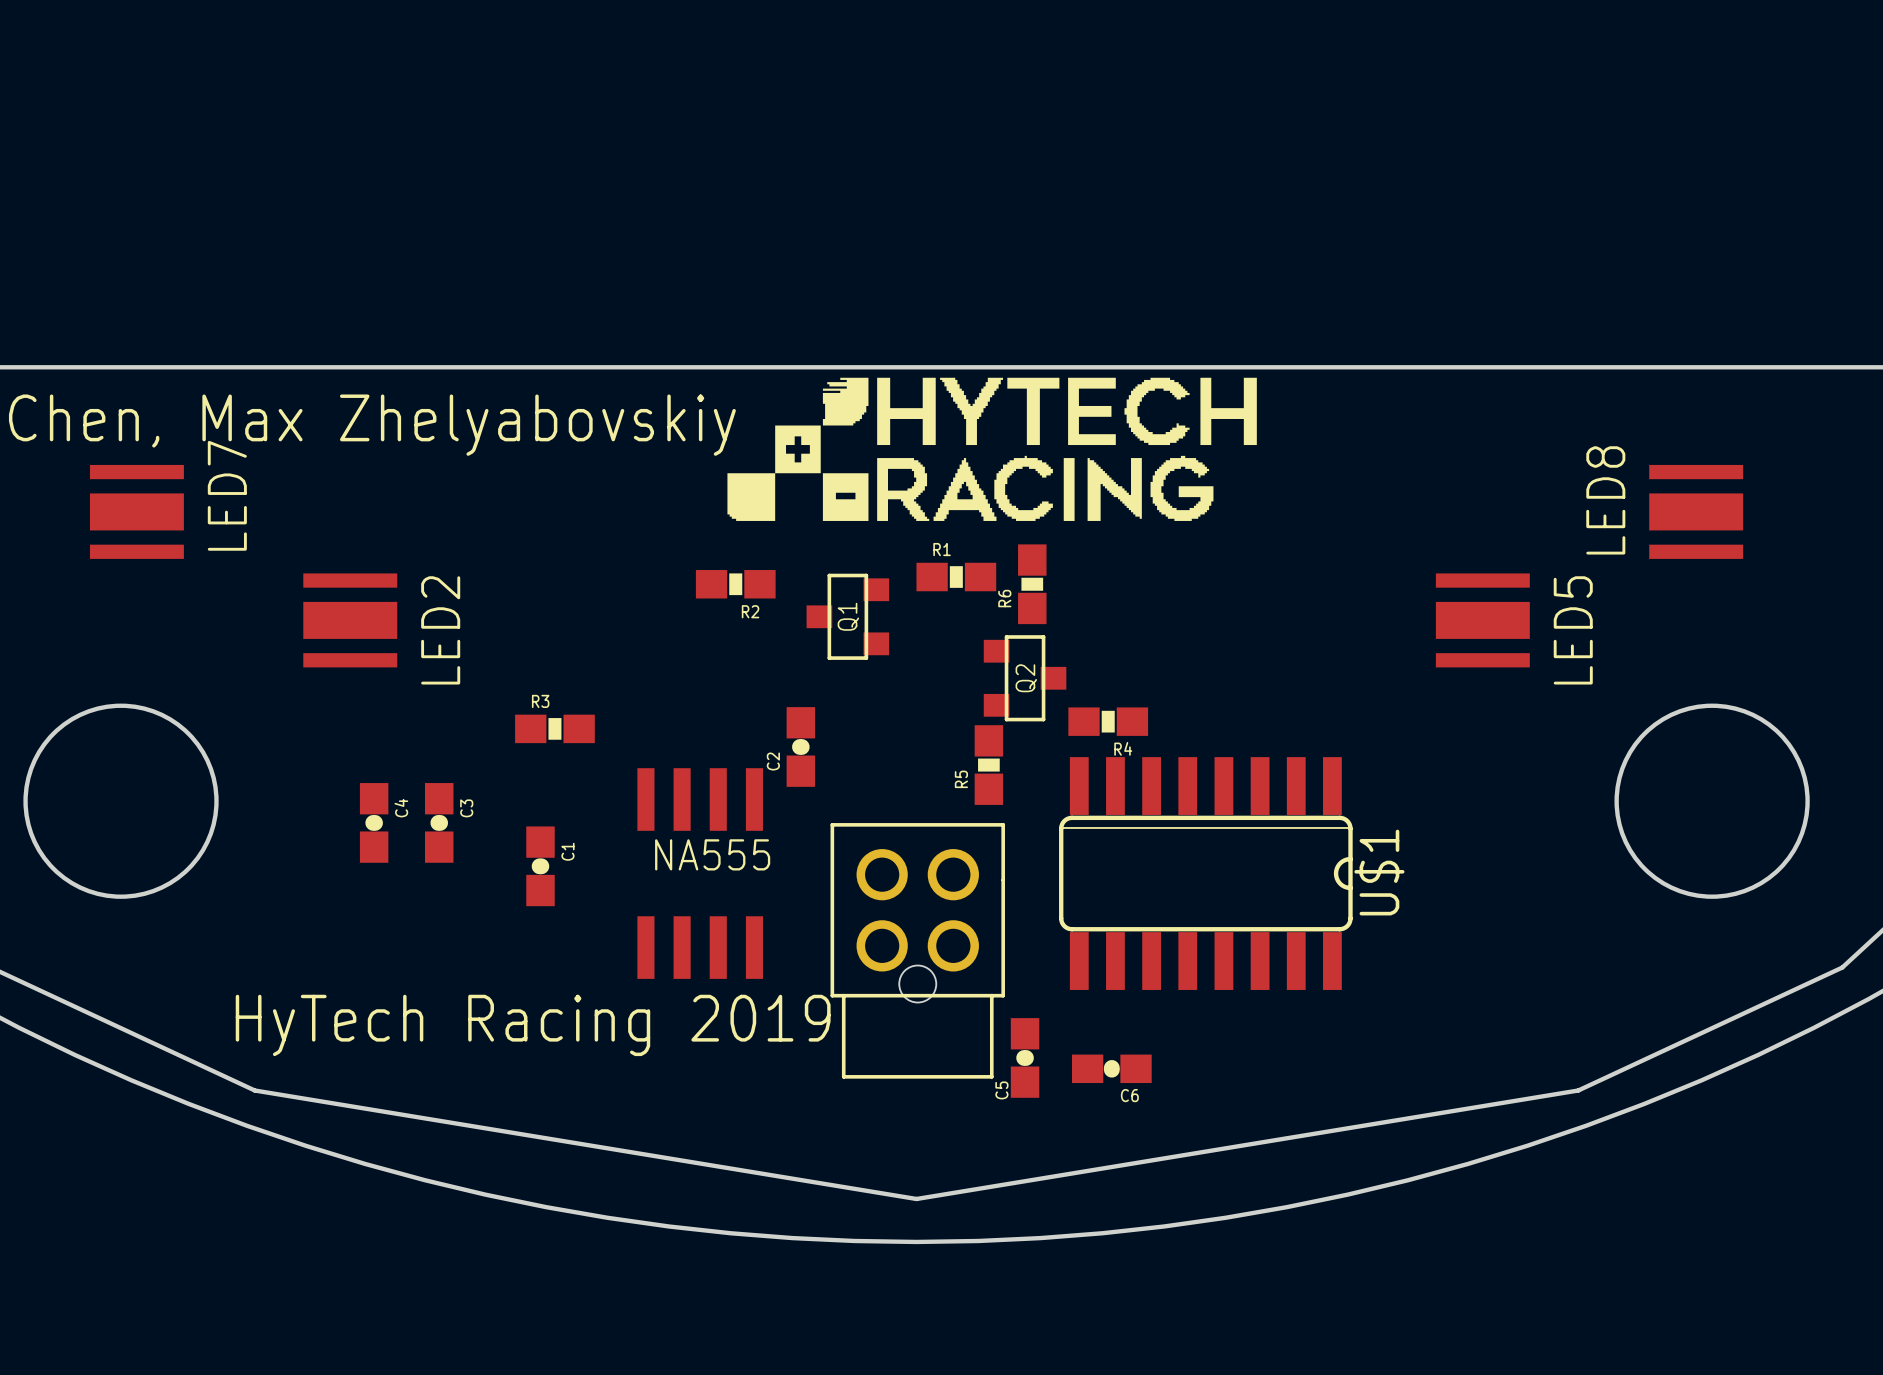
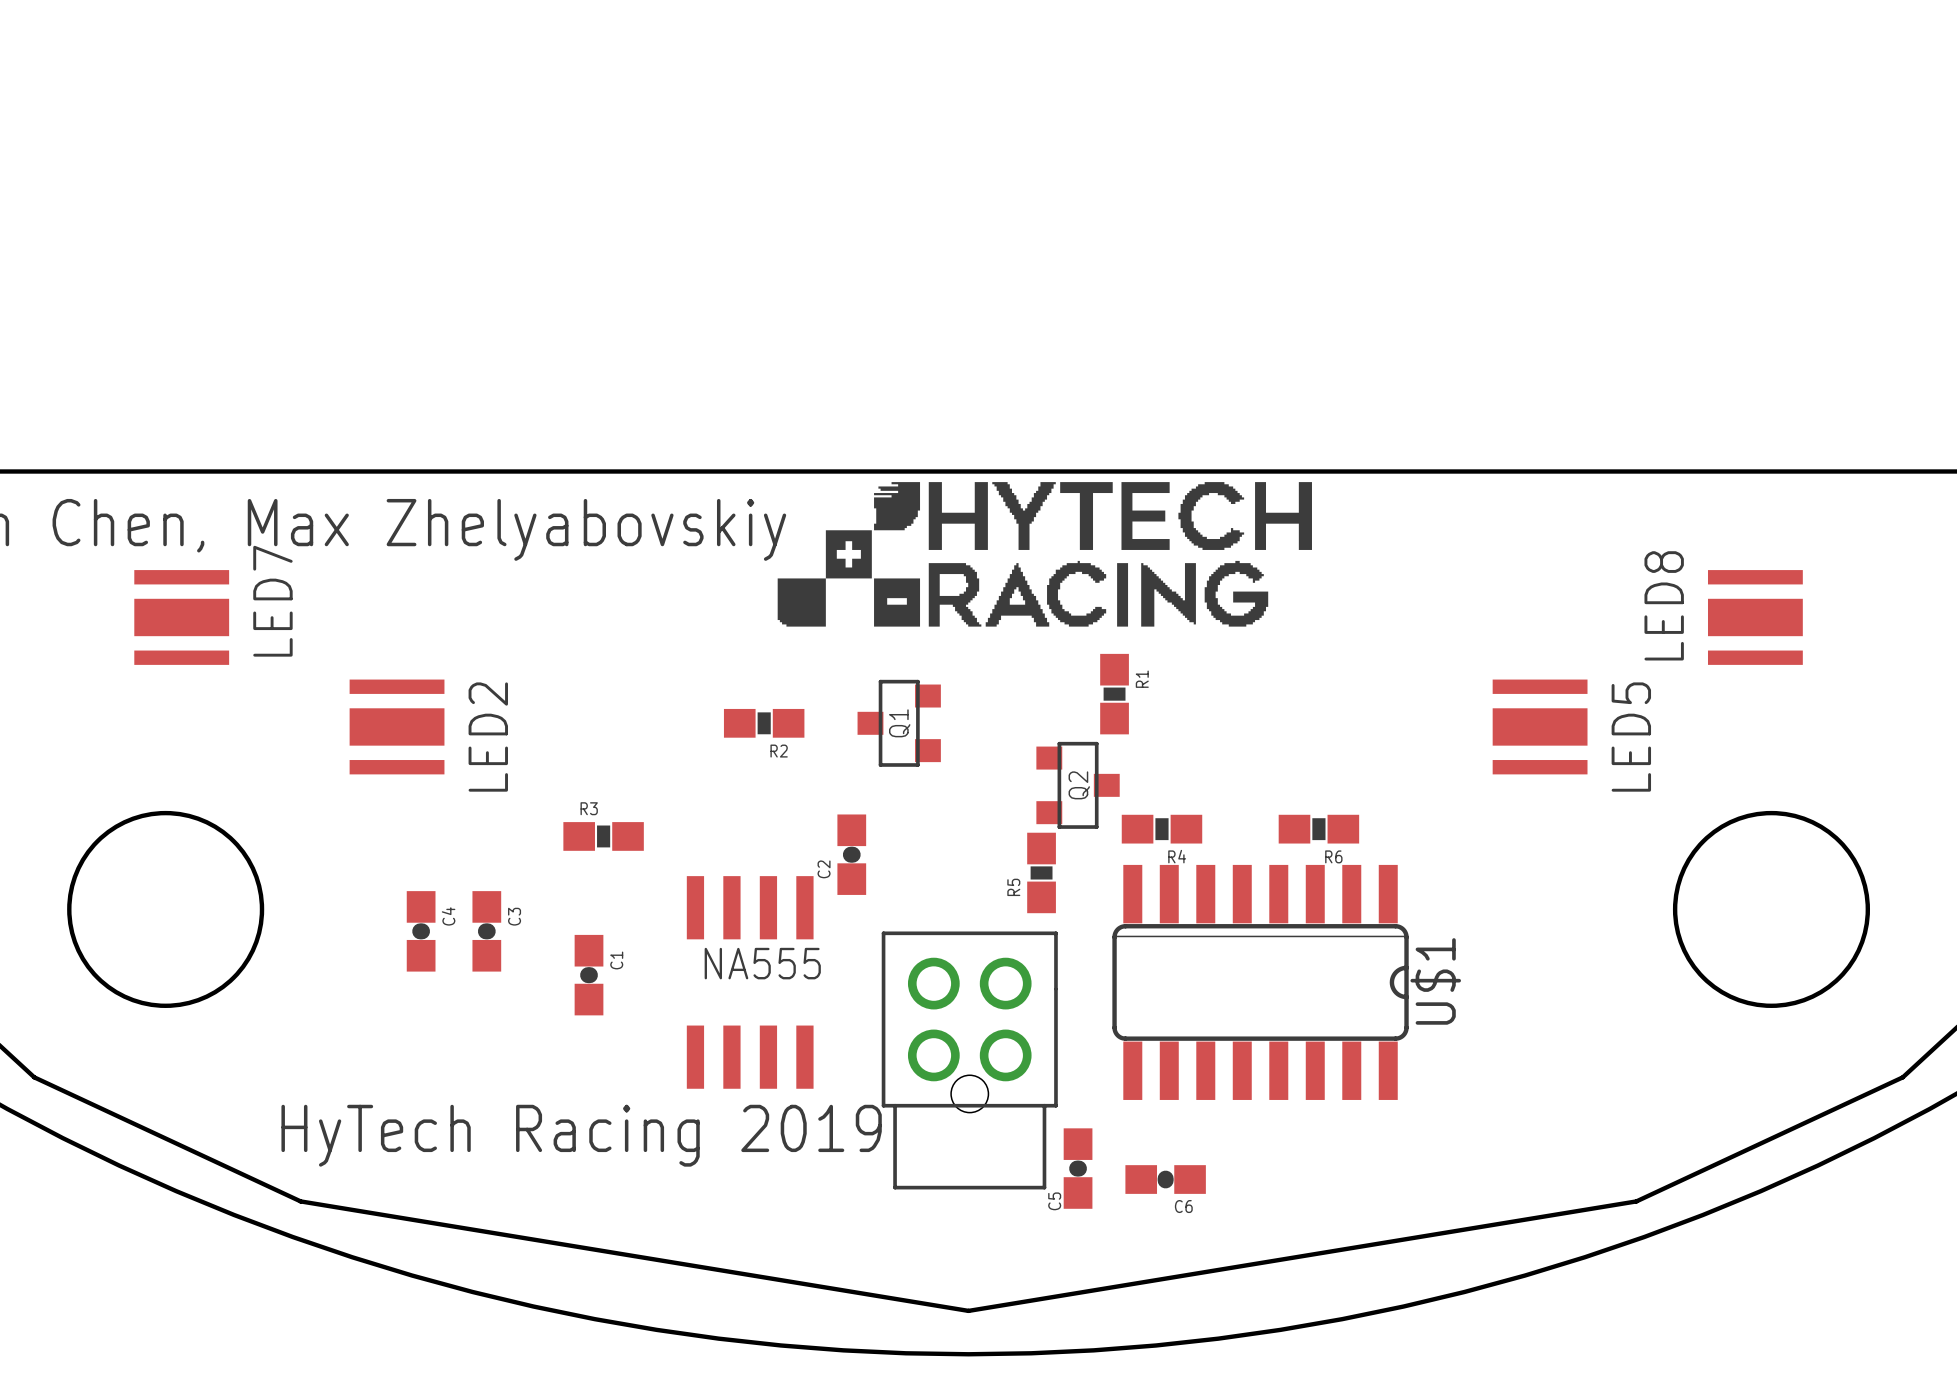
R1 rotation: 0° (956, 577) -> 90° clockwise (1114, 694)
R1 position: (956, 577) -> (1114, 694)
R2 position: (735, 584) -> (764, 723)
R6 rotation: 0° (1032, 584) -> 90° clockwise (1318, 829)
R6 position: (1032, 584) -> (1318, 829)

